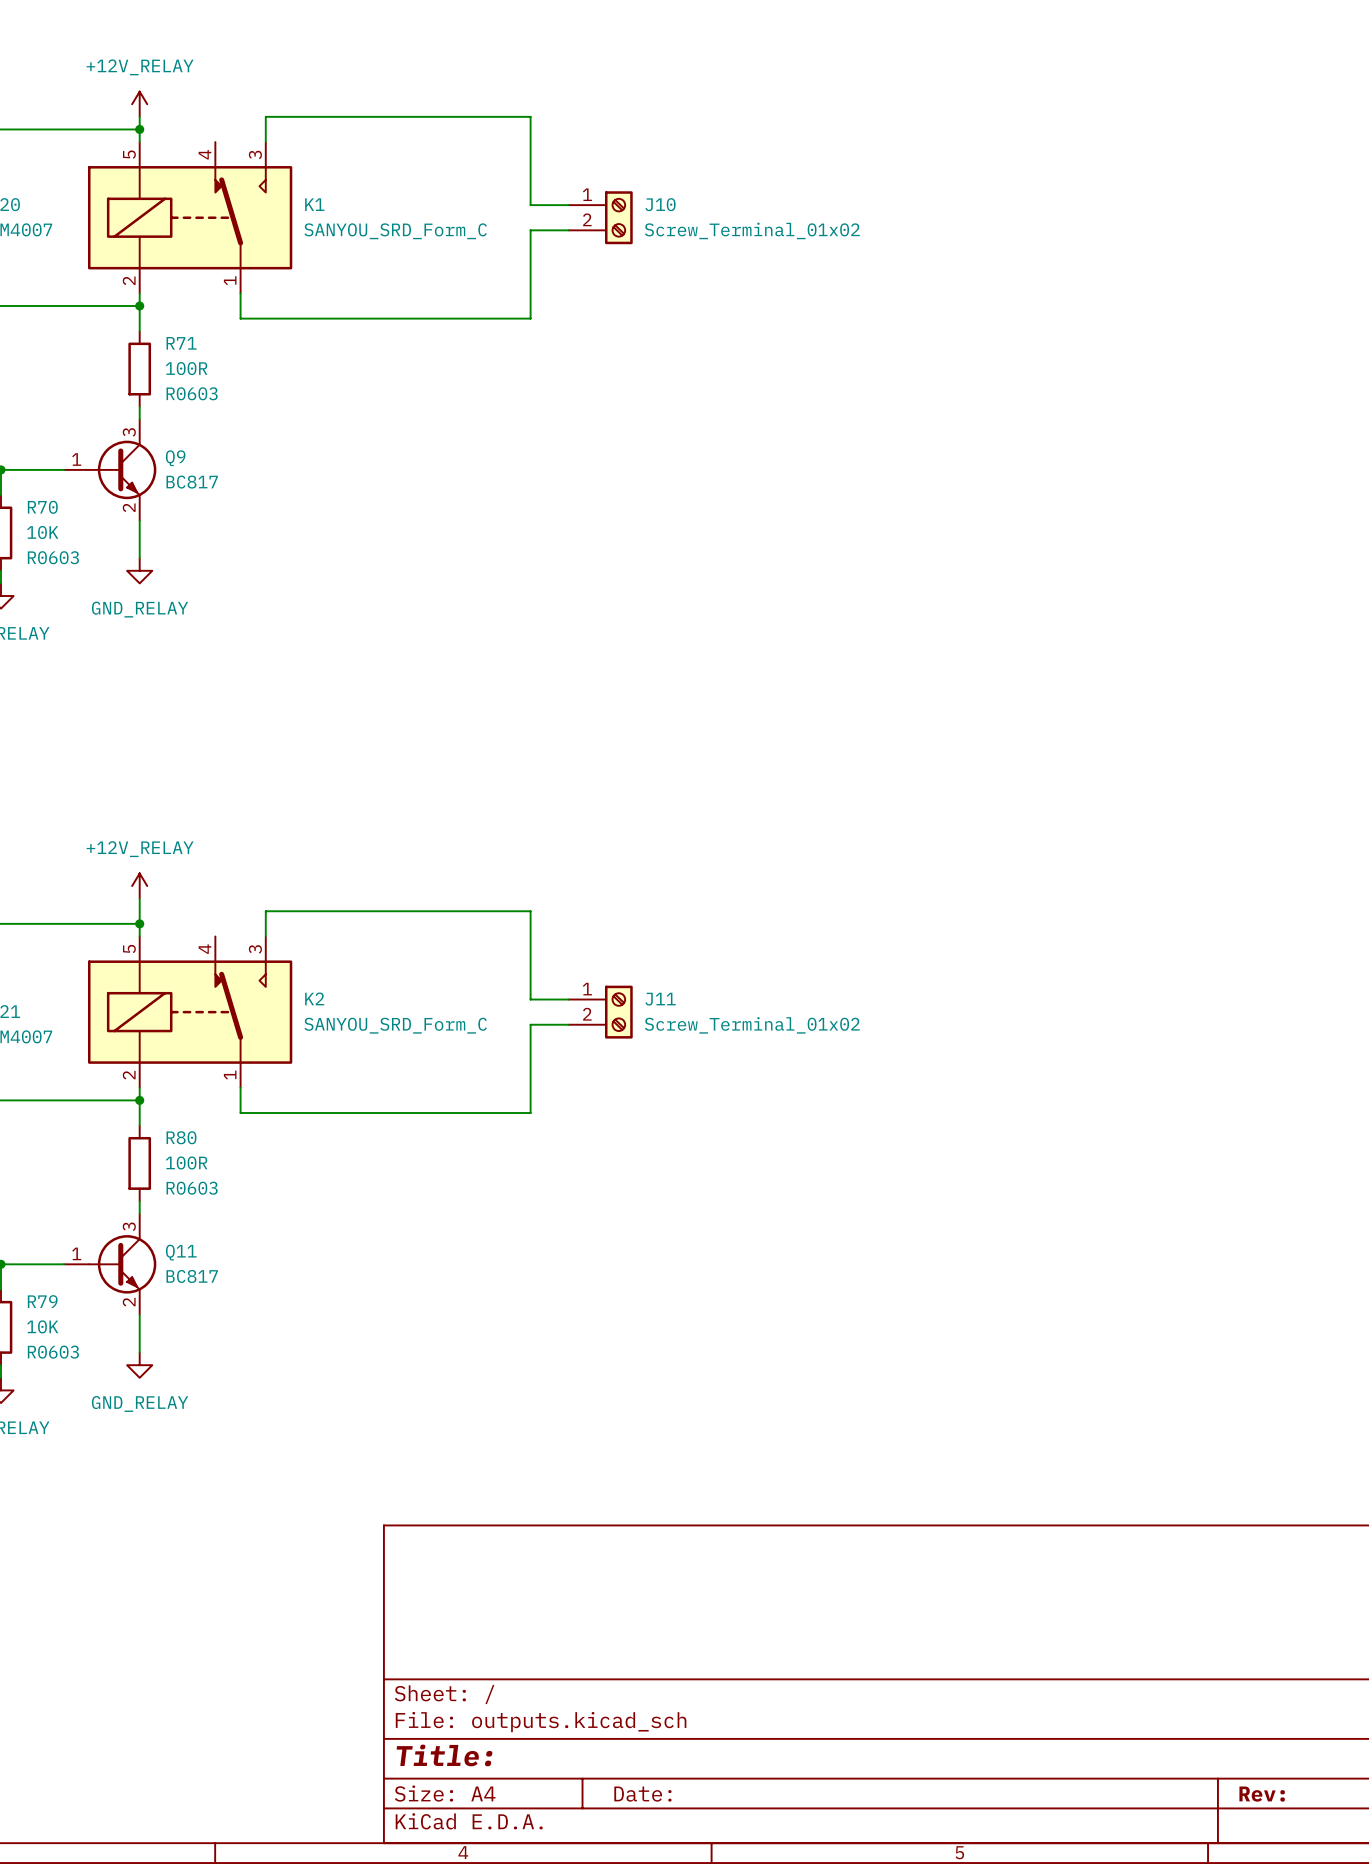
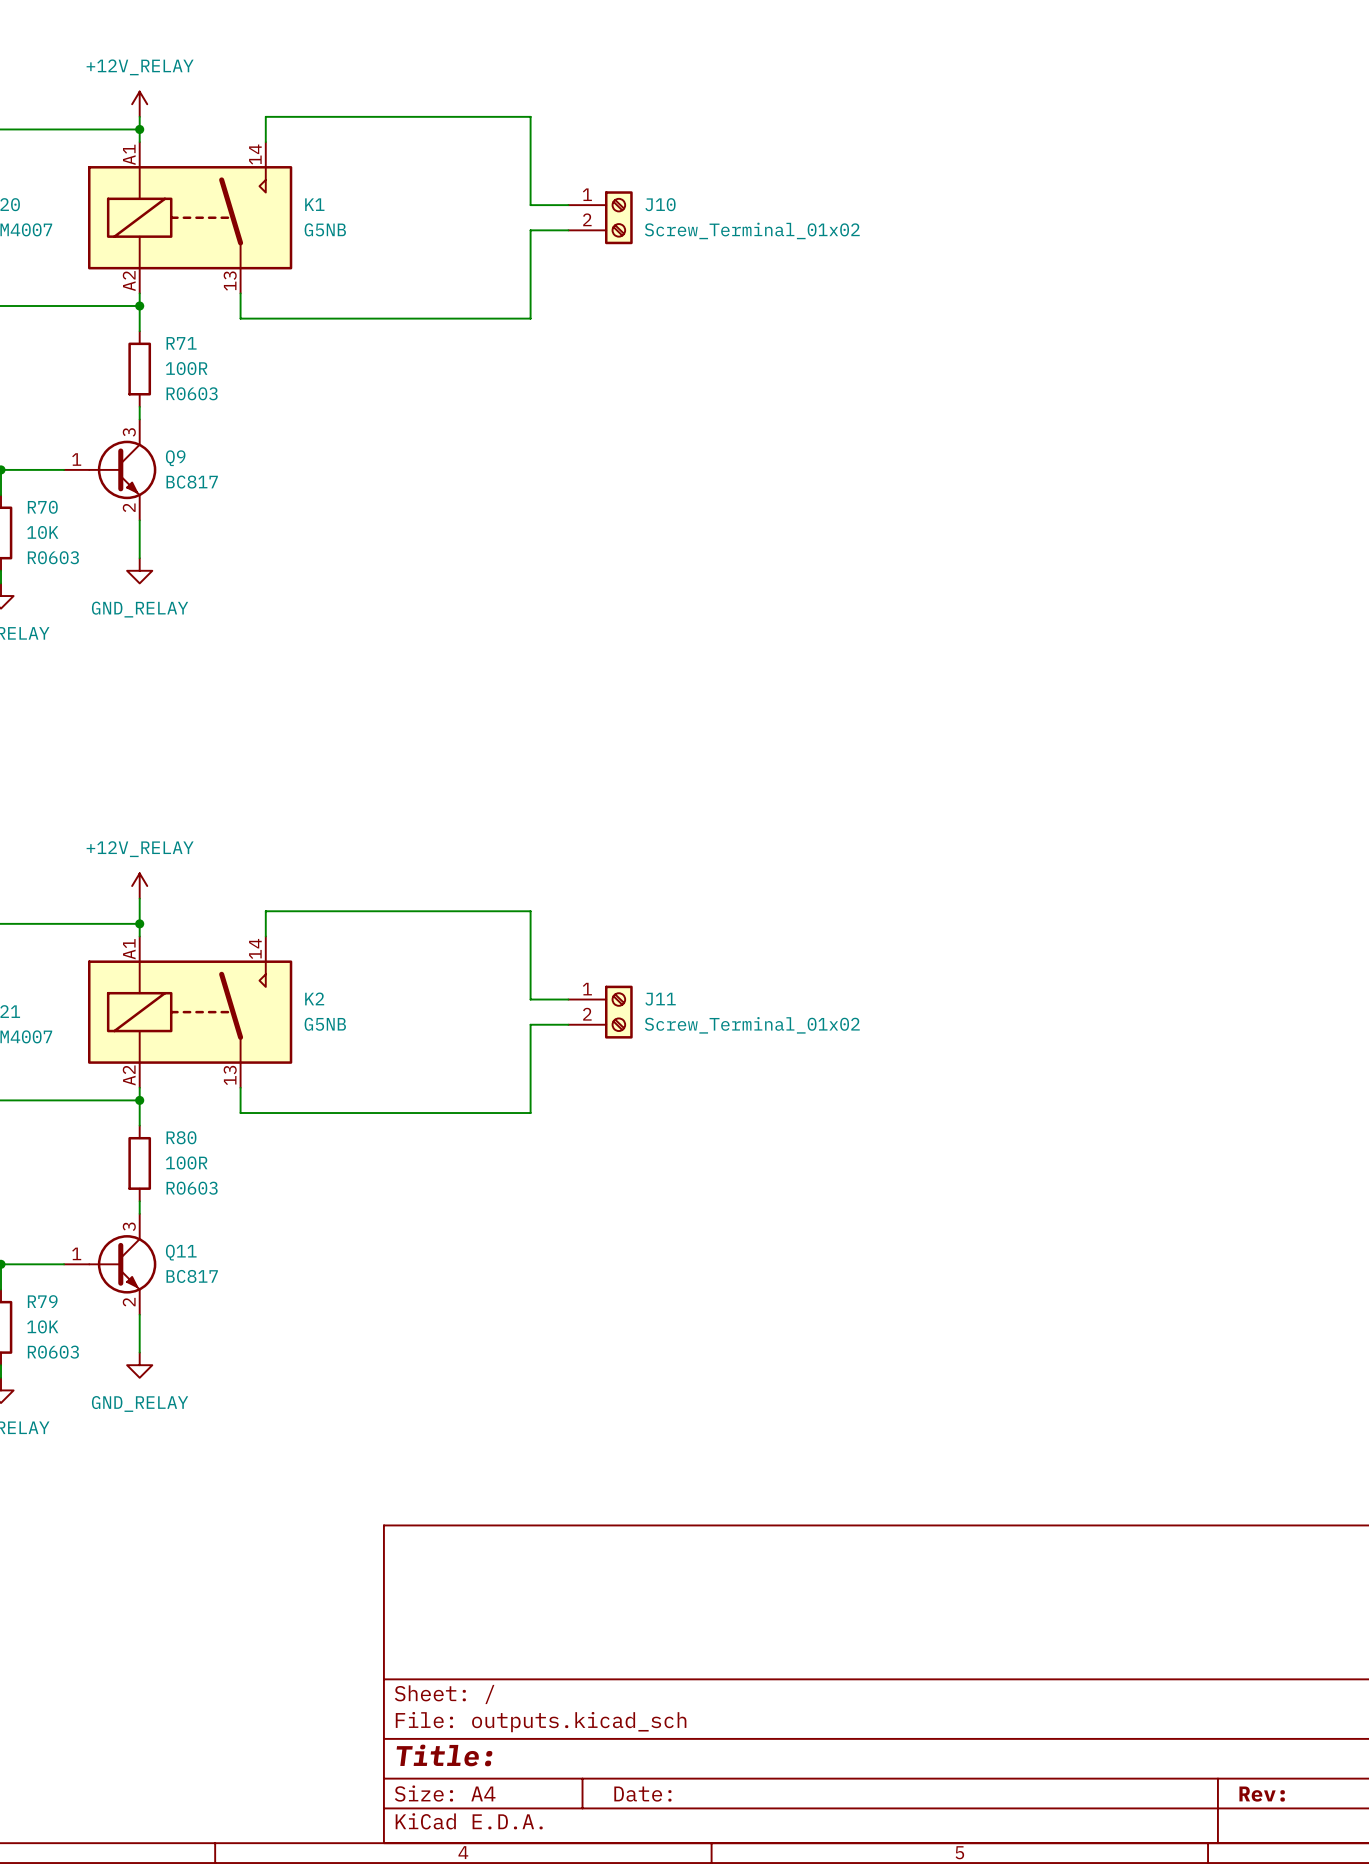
K1 symbol: [88, 142, 293, 294] -> [88, 142, 293, 294]
K1 value: SANYOU_SRD_Form_C (395, 231) -> G5NB (325, 229)
K2 symbol: [88, 936, 293, 1088] -> [88, 936, 293, 1088]
K2 value: SANYOU_SRD_Form_C (395, 1025) -> G5NB (325, 1024)

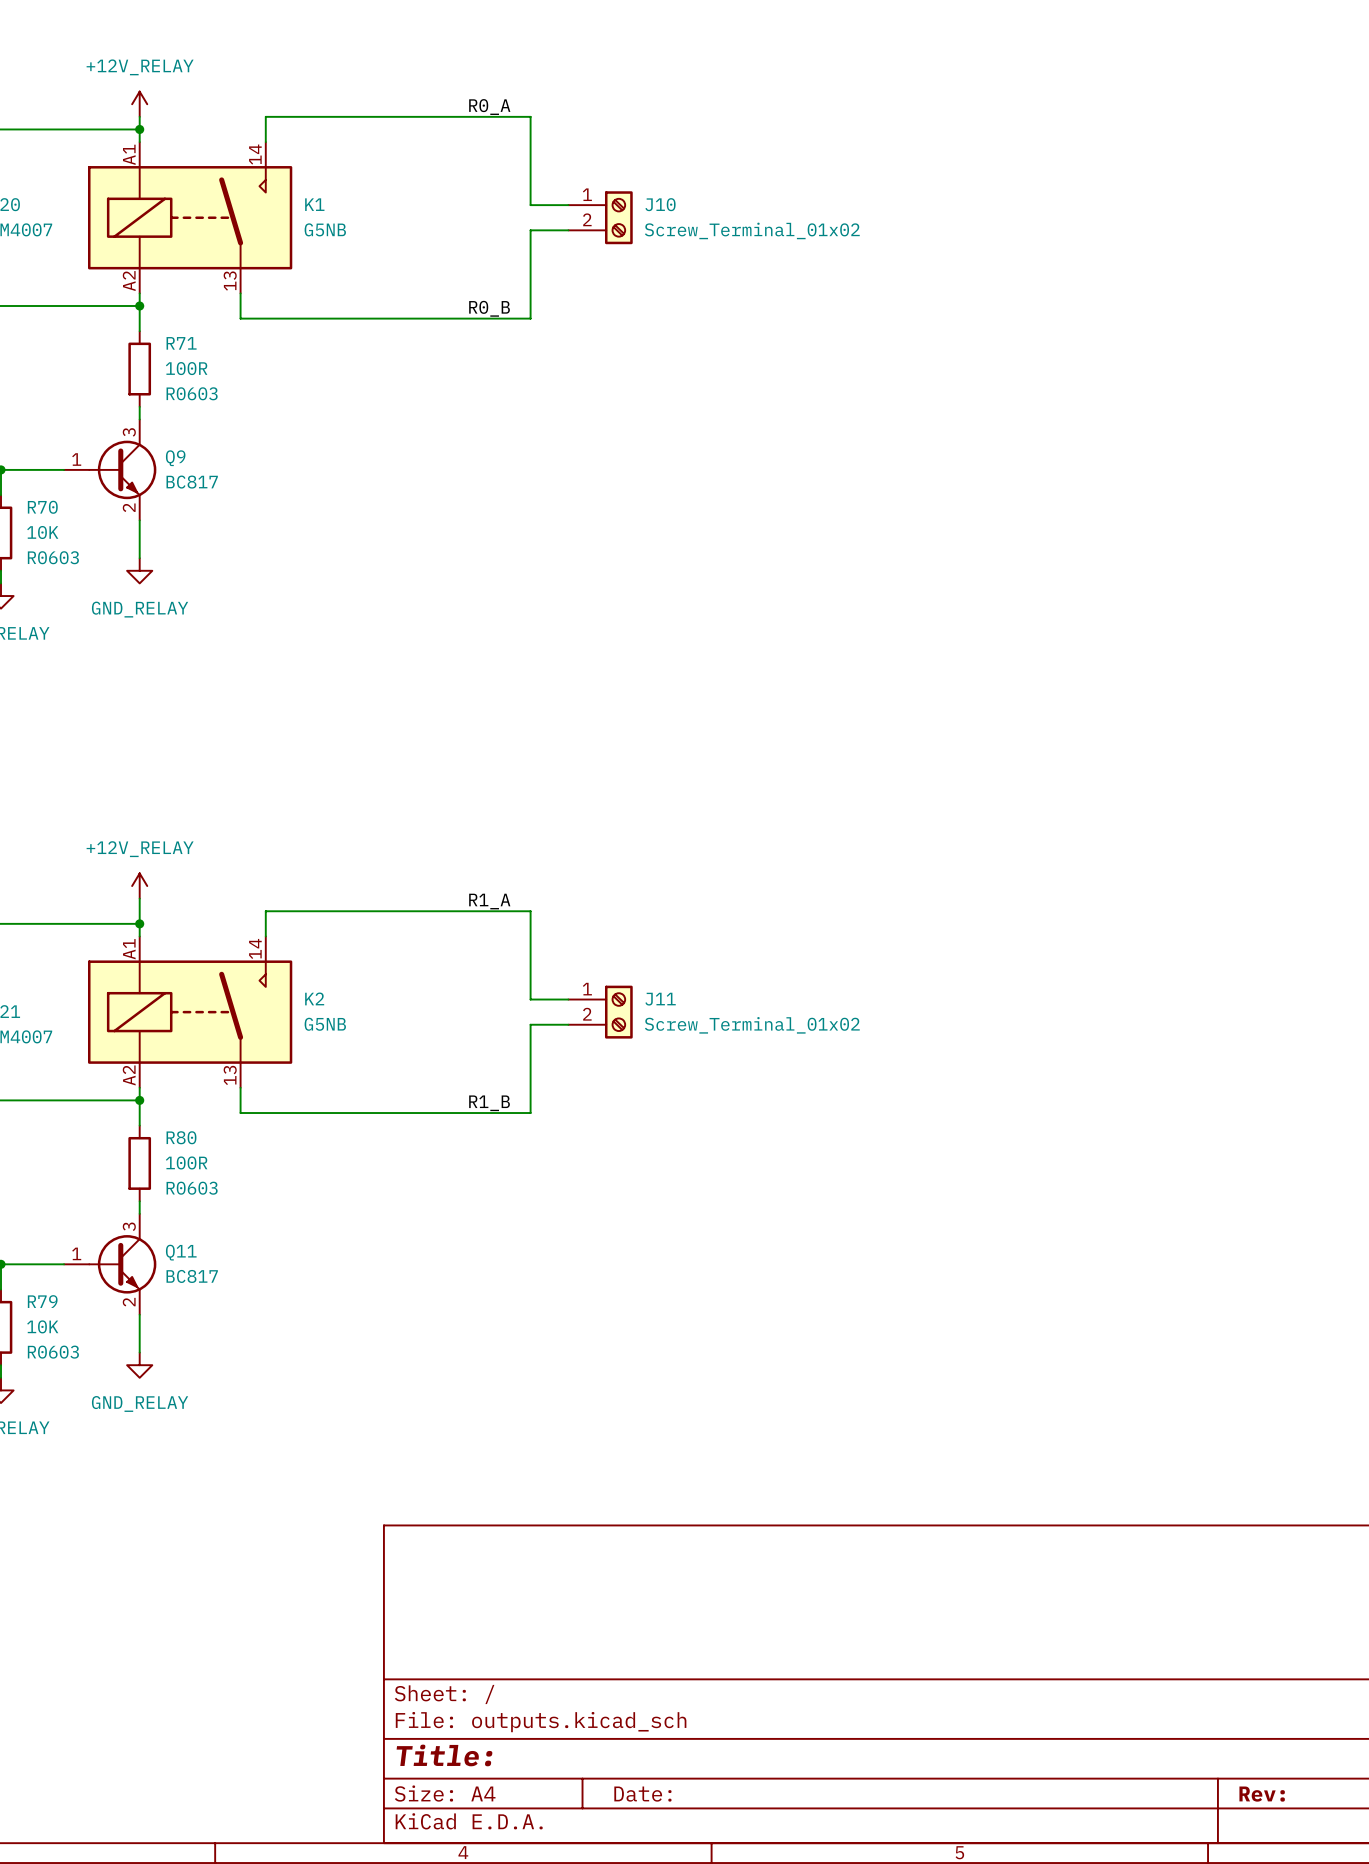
label: none -> R0_A (489, 107)
label: none -> R0_B (489, 308)
label: none -> R1_A (489, 901)
label: none -> R1_B (489, 1103)

